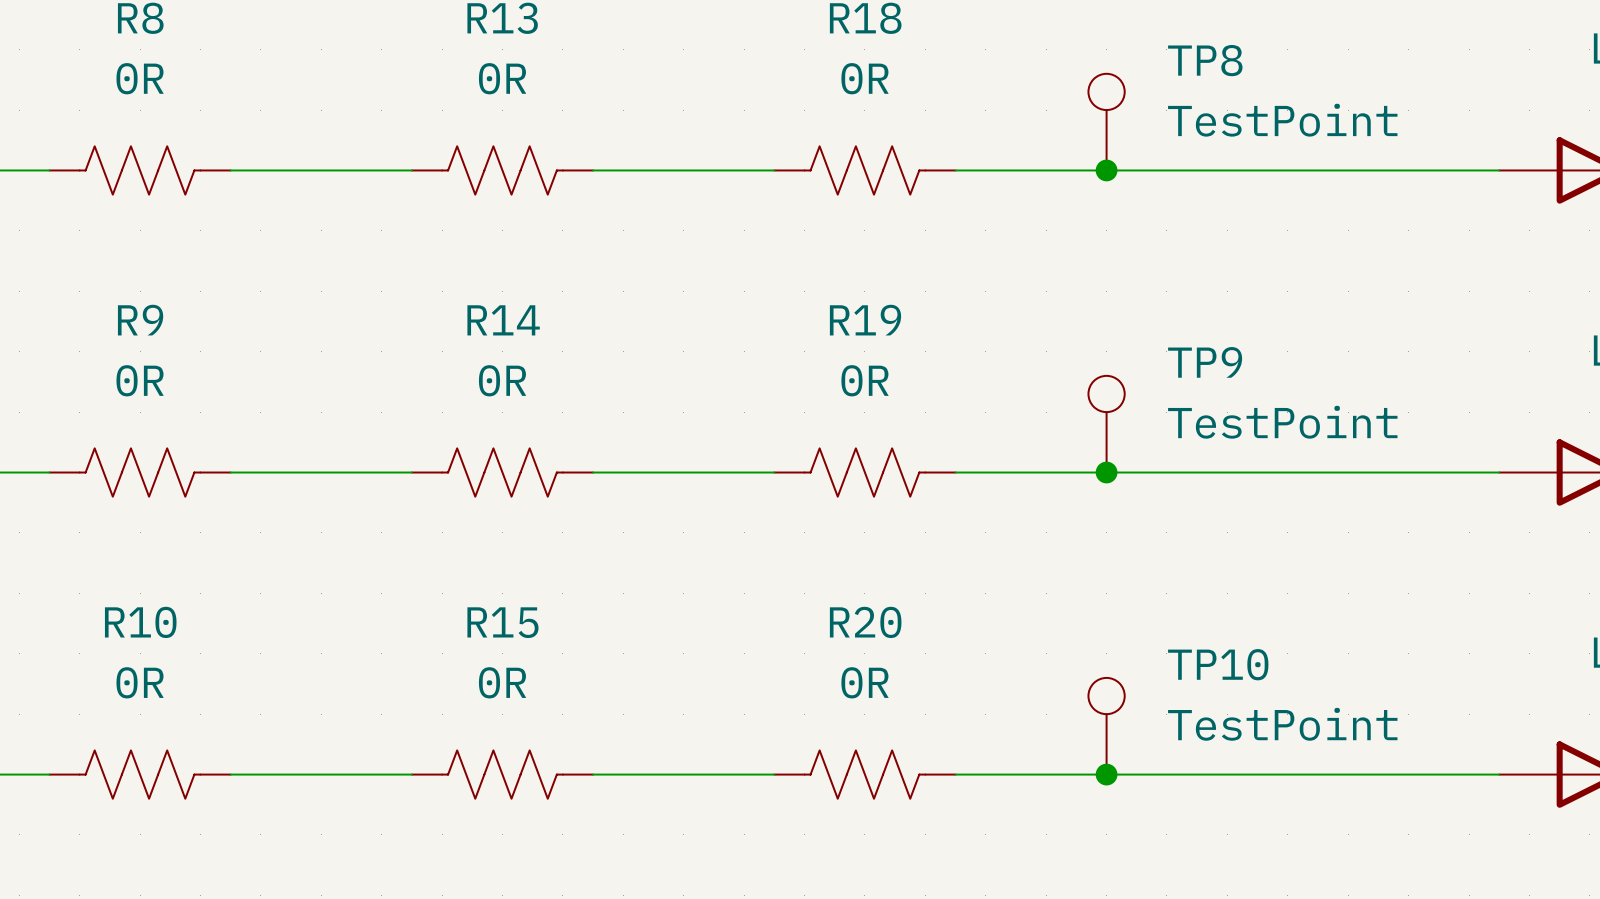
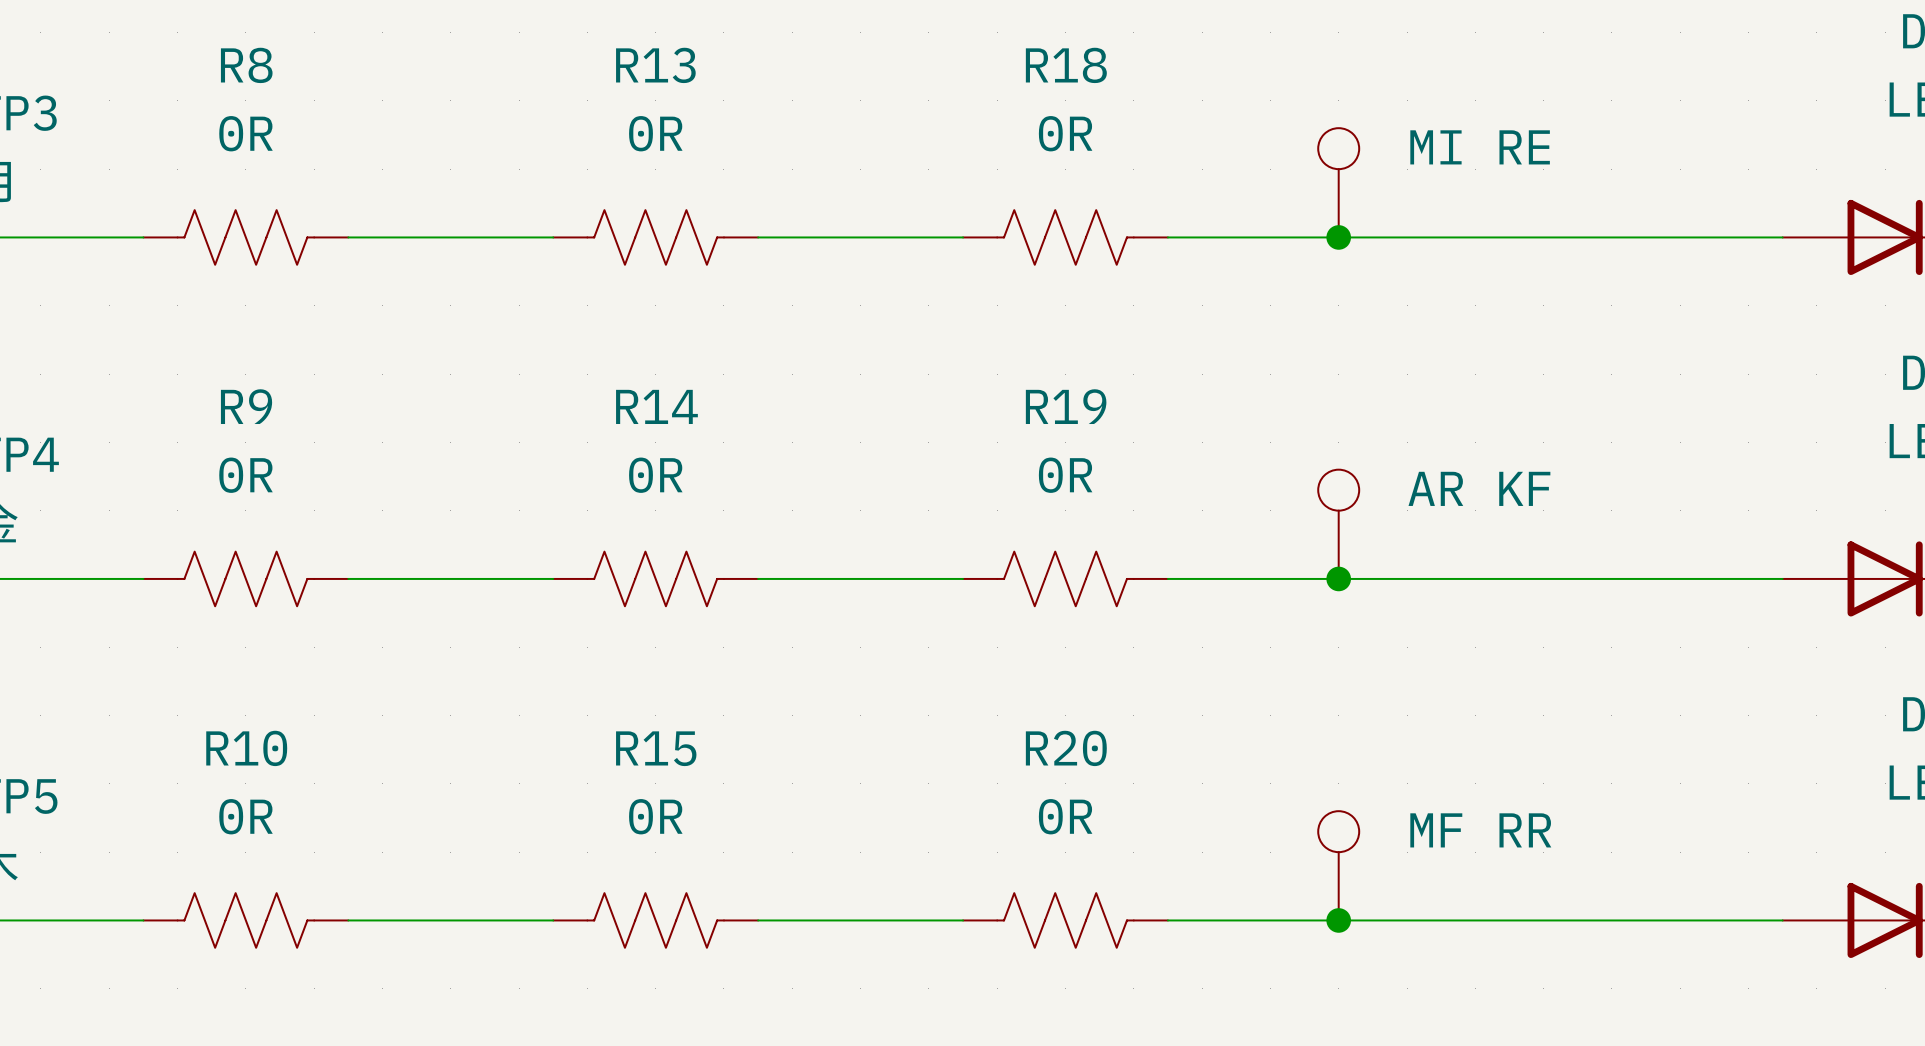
TP8 name: TP8 (1205, 60) -> none
TP8 value: TestPoint (1282, 120) -> MI RE (1480, 147)
TP9 name: TP9 (1205, 362) -> none
TP9 value: TestPoint (1282, 422) -> AR KF (1479, 488)
TP10 name: TP10 (1218, 664) -> none
TP10 value: TestPoint (1282, 724) -> MF RR (1480, 830)

